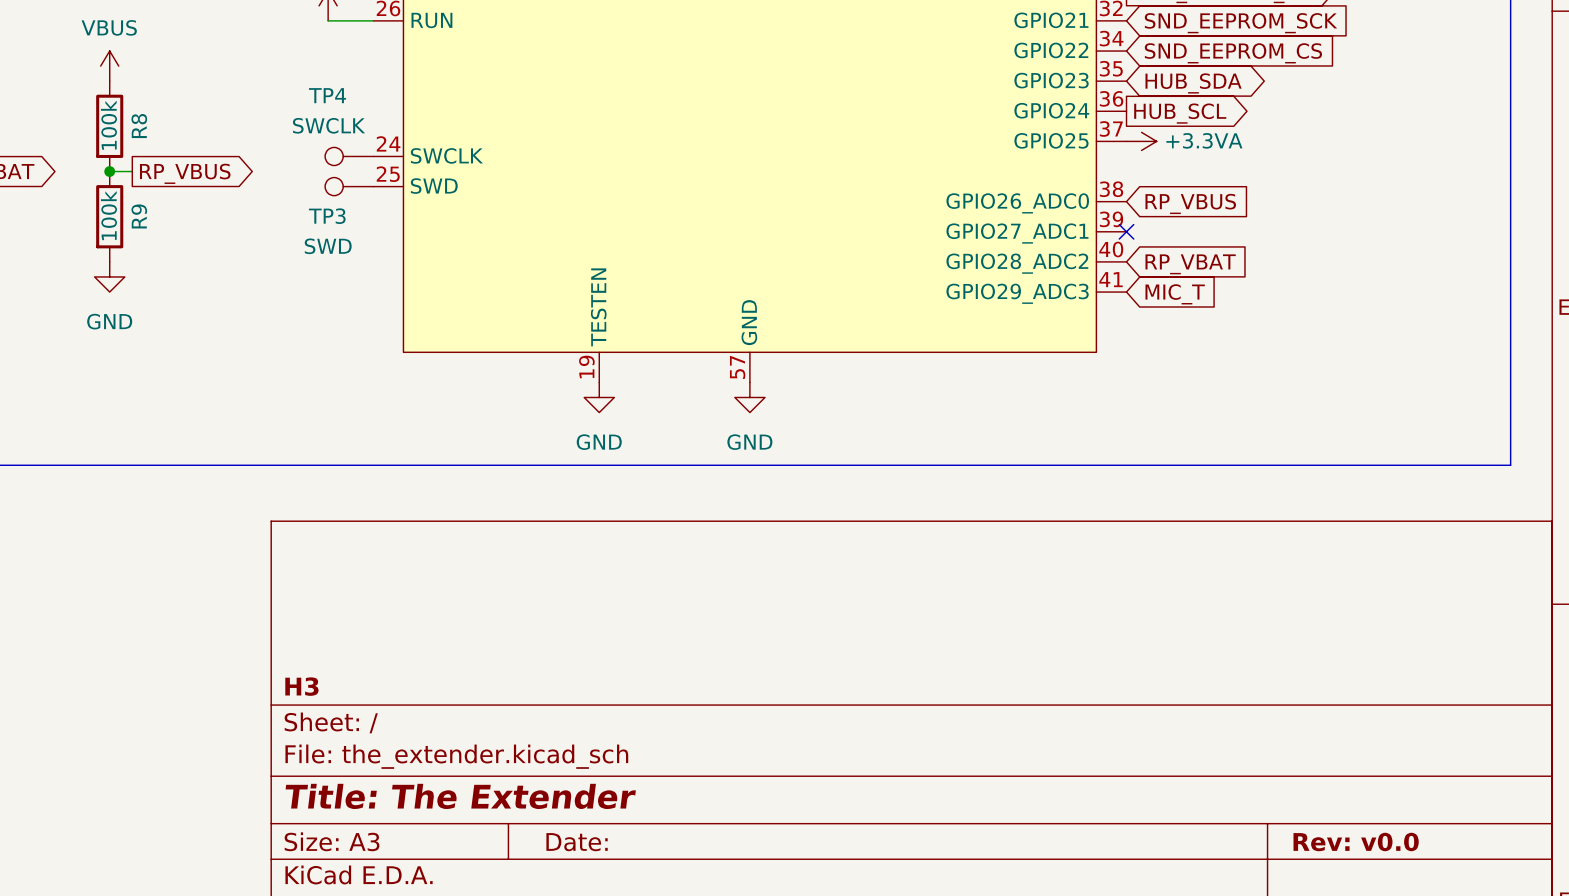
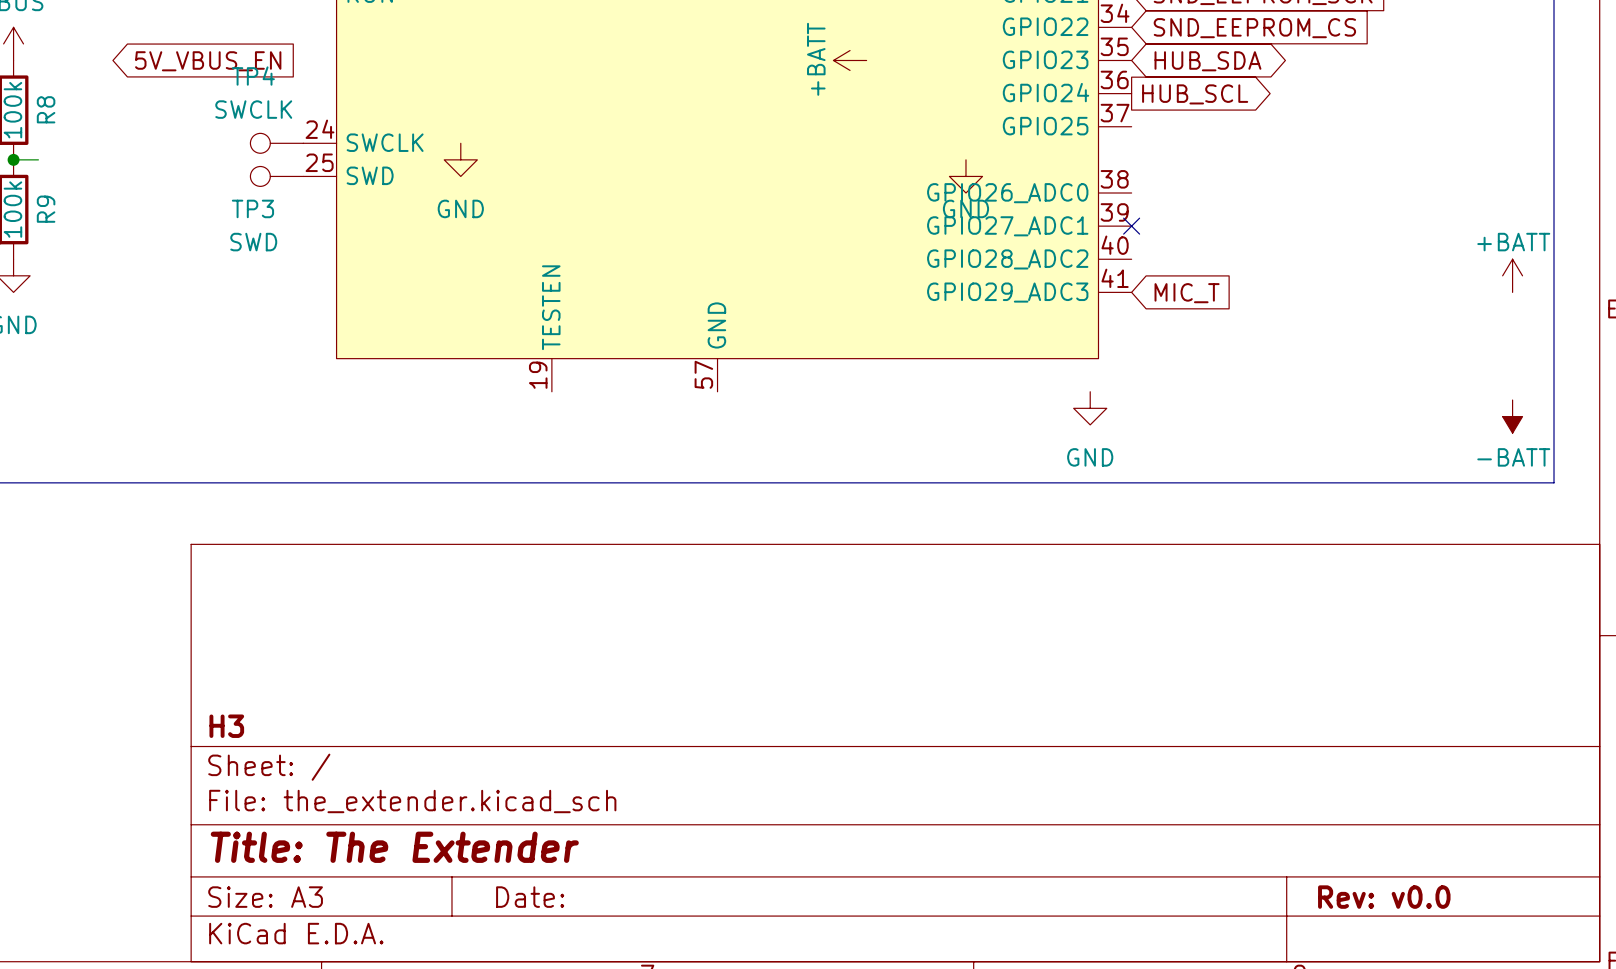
power symbol: none -> +BATT (850, 60)
global label: none -> 5V_VBUS_EN (208, 61)
power symbol: +3.3VA (1141, 141) -> none
power symbol: none -> GND (460, 159)
global label: RP_VBUS (185, 173) -> none
power symbol: none -> GND (965, 176)
global label: RP_VBUS (1190, 203) -> none
global label: RP_VBAT (1190, 264) -> none
power symbol: none -> +BATT (1512, 275)
power symbol: GND (599, 397) -> none
power symbol: GND (749, 397) -> none
power symbol: none -> GND (1090, 408)
power symbol: none -> -BATT (1512, 416)

